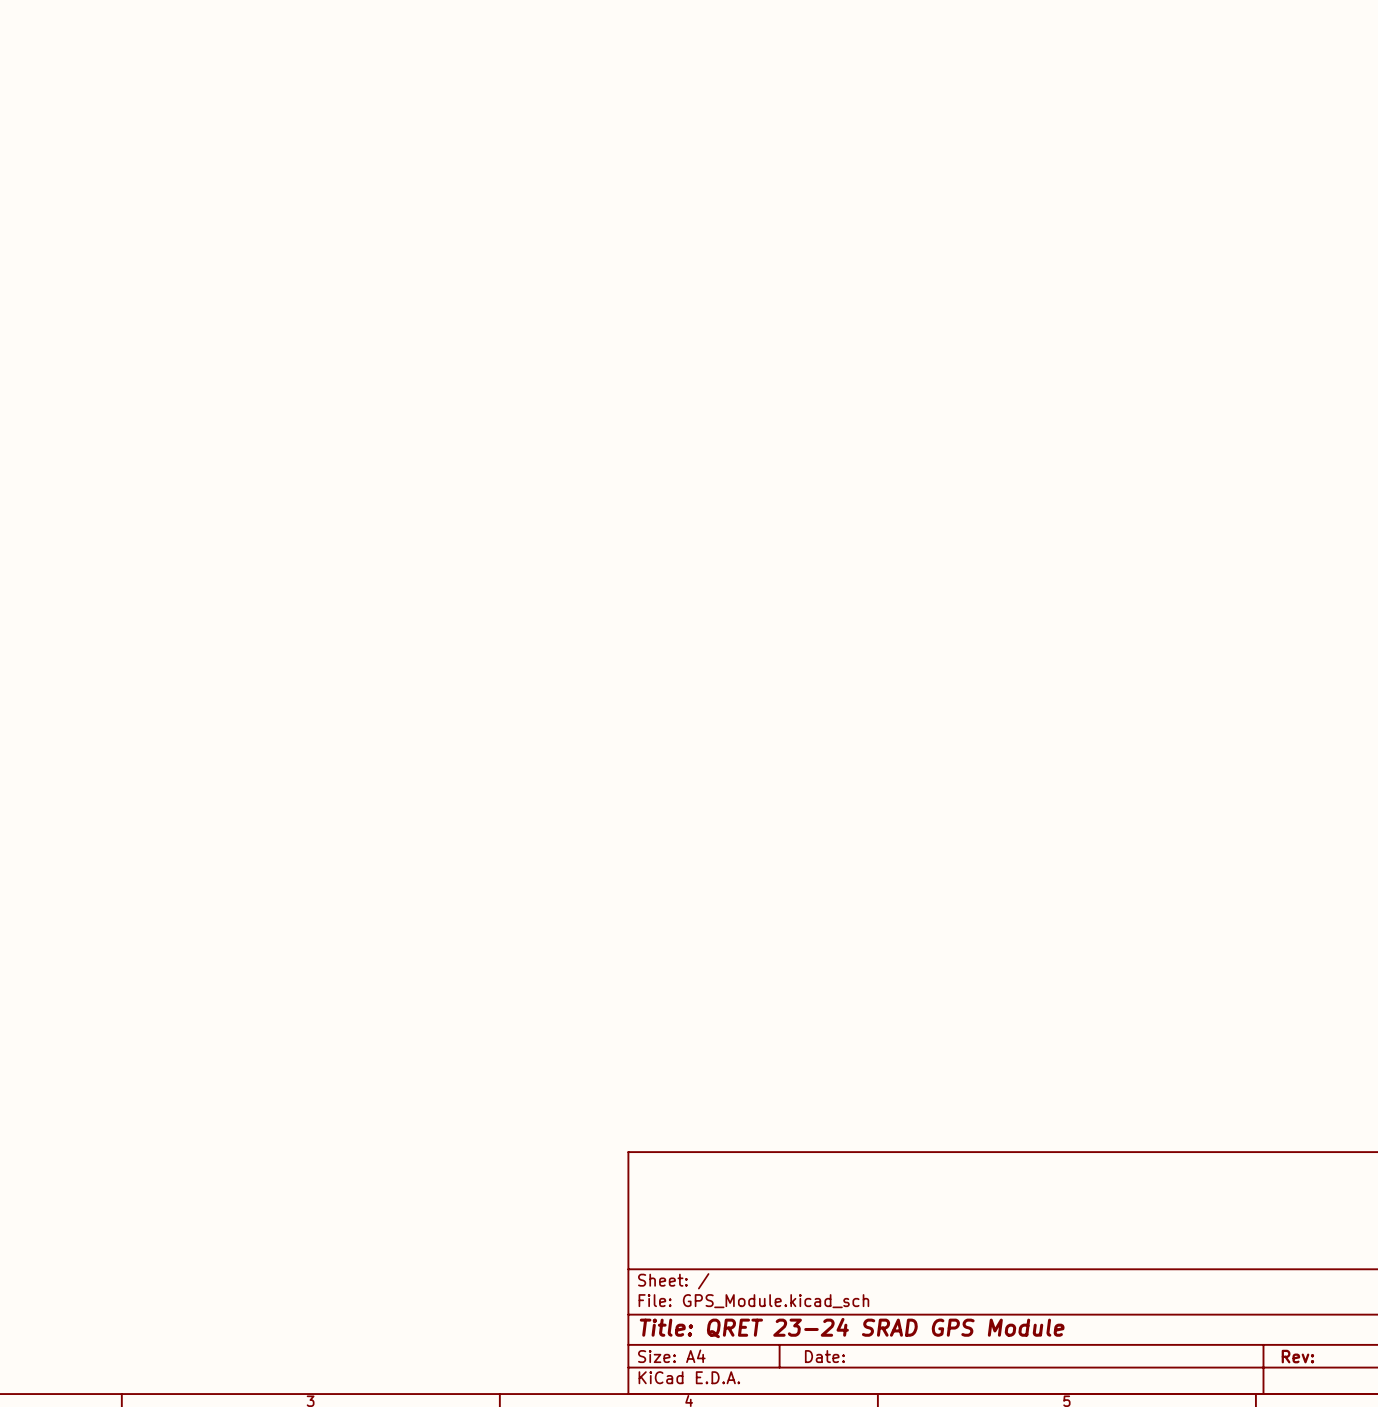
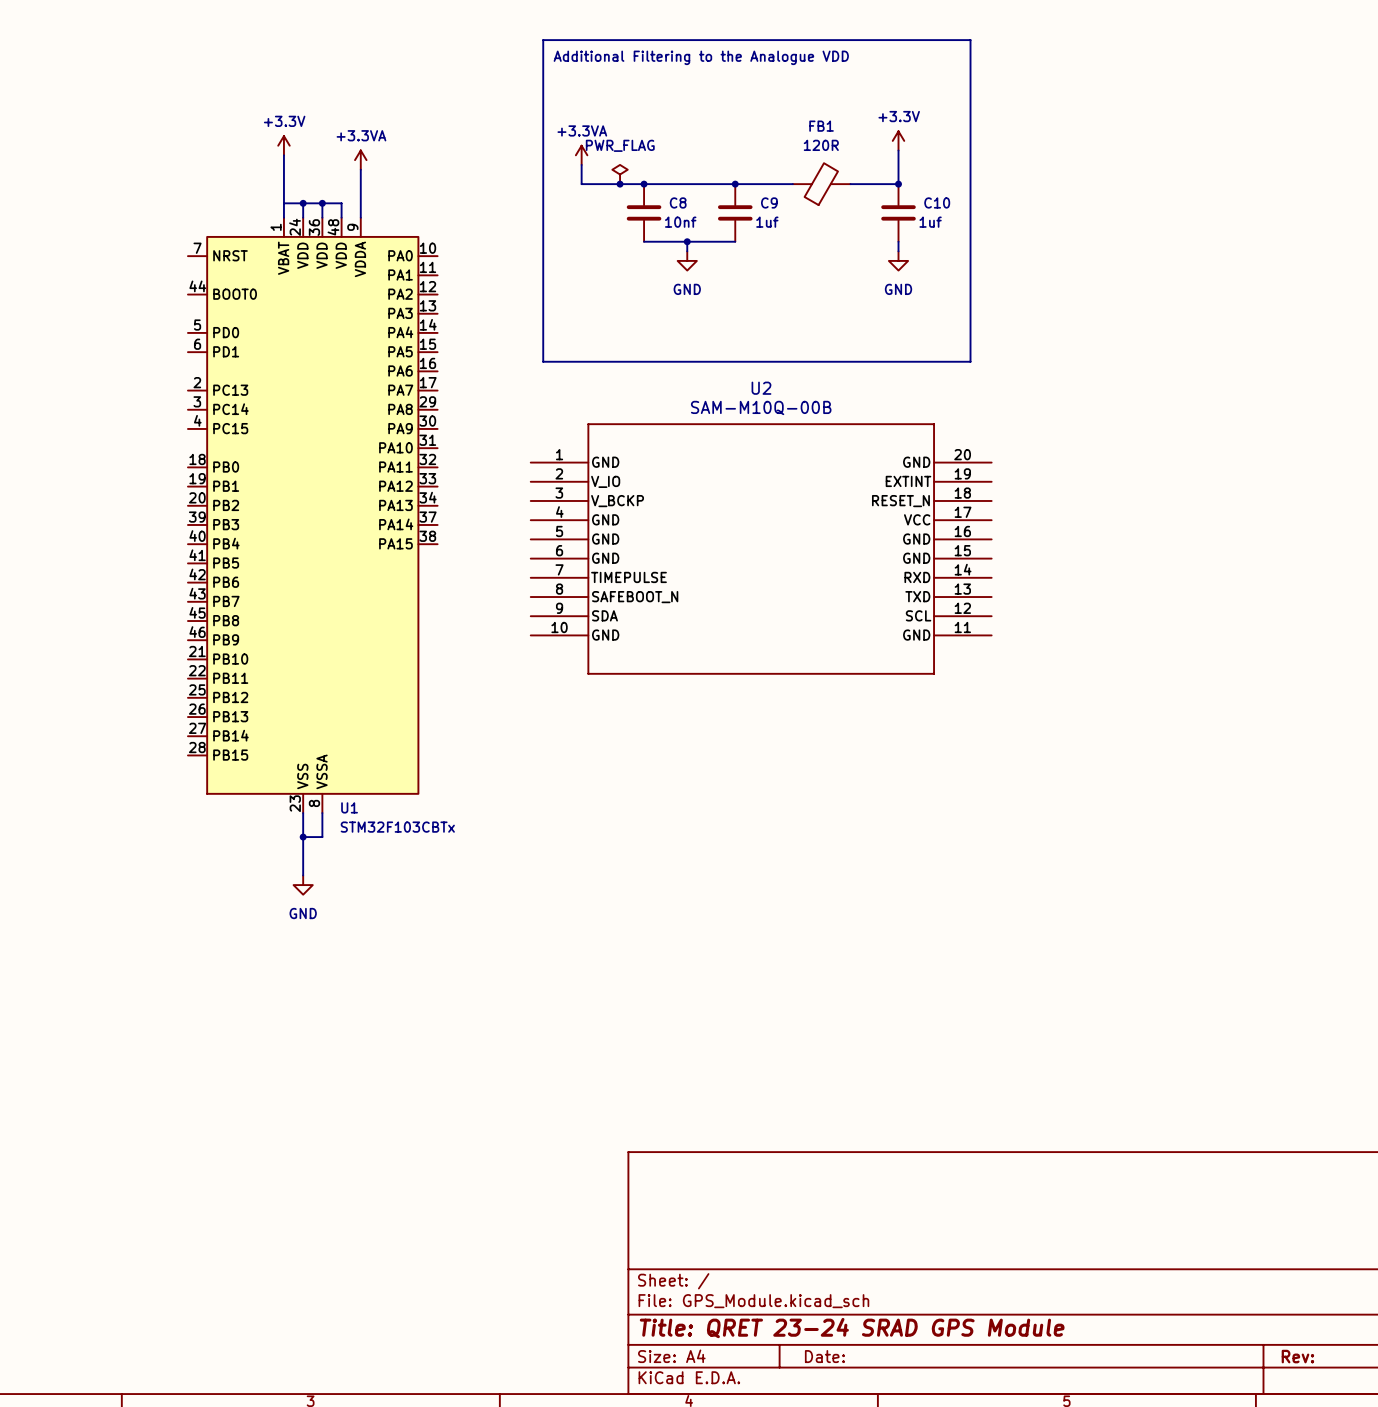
line: none -> (543, 40) (970, 40) (970, 361) (543, 361) (543, 40)
text: none -> Additional Filtering to the Analogue VDD (701, 57)
power symbol: none -> +3.3V (898, 140)
power symbol: none -> +3.3V (283, 145)
wire: none -> (898, 150) (898, 184) (850, 184)
wire: none -> (283, 155) (283, 217)
power symbol: none -> +3.3VA (581, 155)
power symbol: none -> +3.3VA (360, 160)
wire: none -> (581, 164) (581, 184) (792, 184)
wire: none -> (360, 169) (360, 217)
power symbol: none -> PWR_FLAG (620, 174)
junction: none -> (620, 184)
junction: none -> (644, 184)
junction: none -> (735, 184)
FB1: none -> 120R (821, 184)
junction: none -> (898, 184)
wire: none -> (283, 203) (341, 203) (341, 217)
wire: none -> (303, 203) (303, 217)
junction: none -> (303, 203)
wire: none -> (322, 203) (322, 217)
junction: none -> (322, 203)
C8: none -> 10nf (644, 212)
C9: none -> 1uf (735, 212)
C10: none -> 1uf (898, 212)
wire: none -> (644, 241) (735, 241)
wire: none -> (687, 241) (687, 251)
junction: none -> (687, 241)
wire: none -> (898, 241) (898, 251)
power symbol: none -> GND (687, 260)
power symbol: none -> GND (898, 260)
U1: none -> STM32F103CBTx (312, 515)
U2: none -> SAM-M10Q-00B (761, 549)
wire: none -> (303, 813) (303, 875)
wire: none -> (322, 813) (322, 837) (303, 837)
junction: none -> (303, 837)
power symbol: none -> GND (303, 885)

